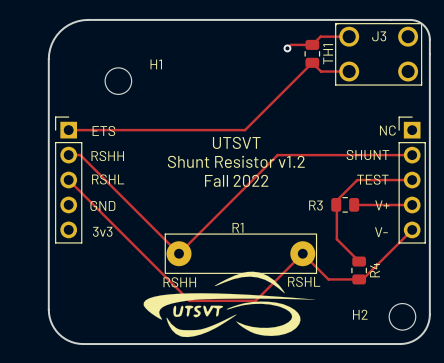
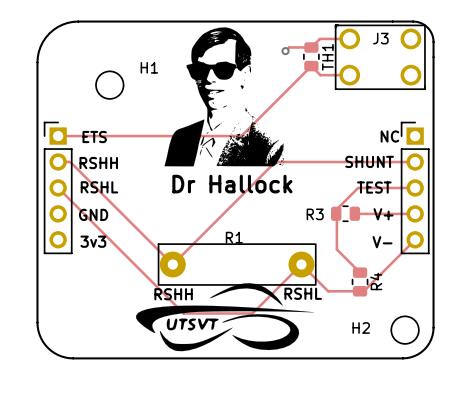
drawing: none -> [164, 27, 284, 167]
text: UTSVT (236, 142) -> none
text: Shunt Resistor v1.2 (236, 161) -> none
text: Fall 2022 (236, 180) -> none

